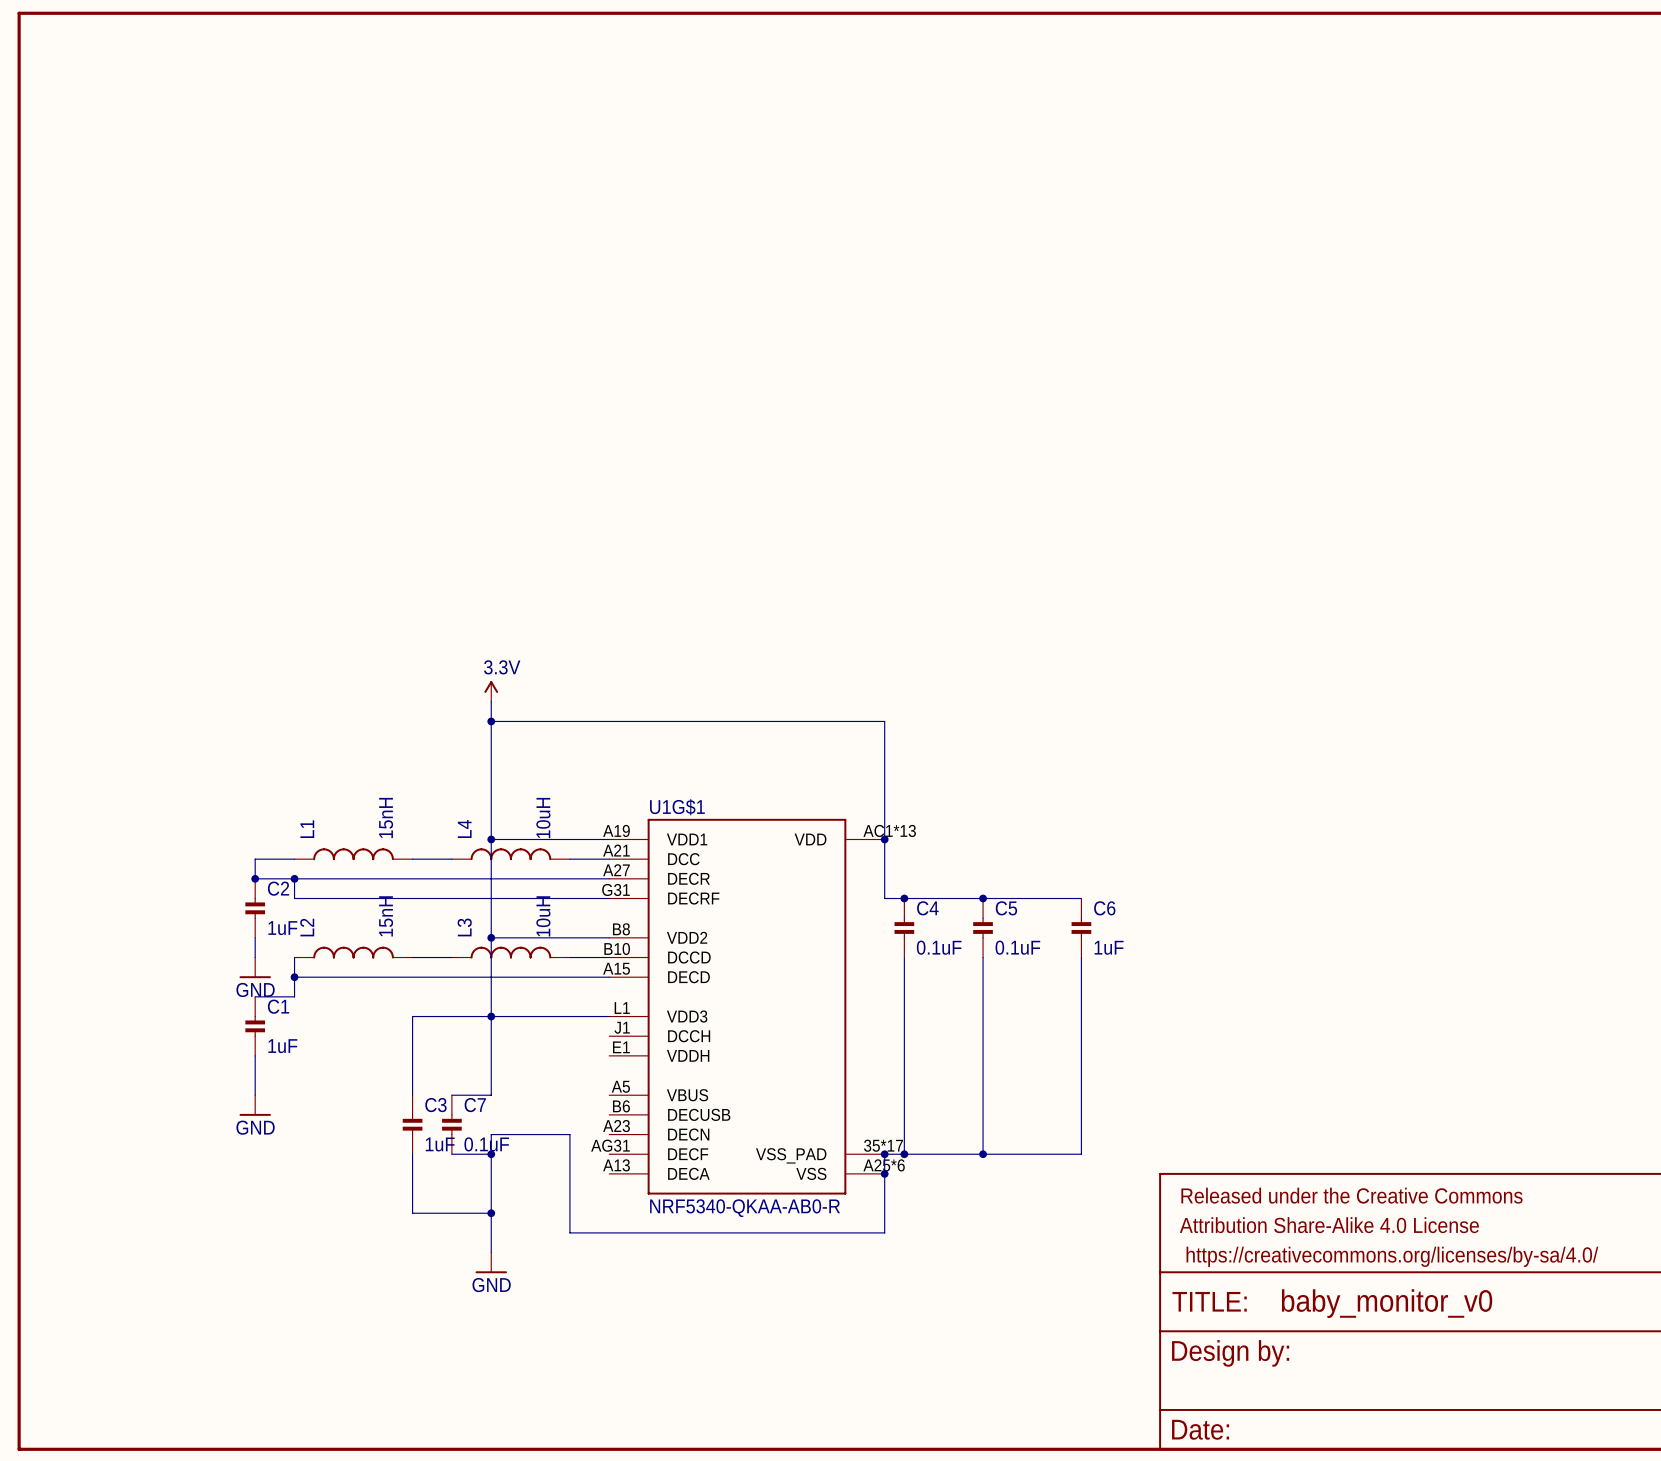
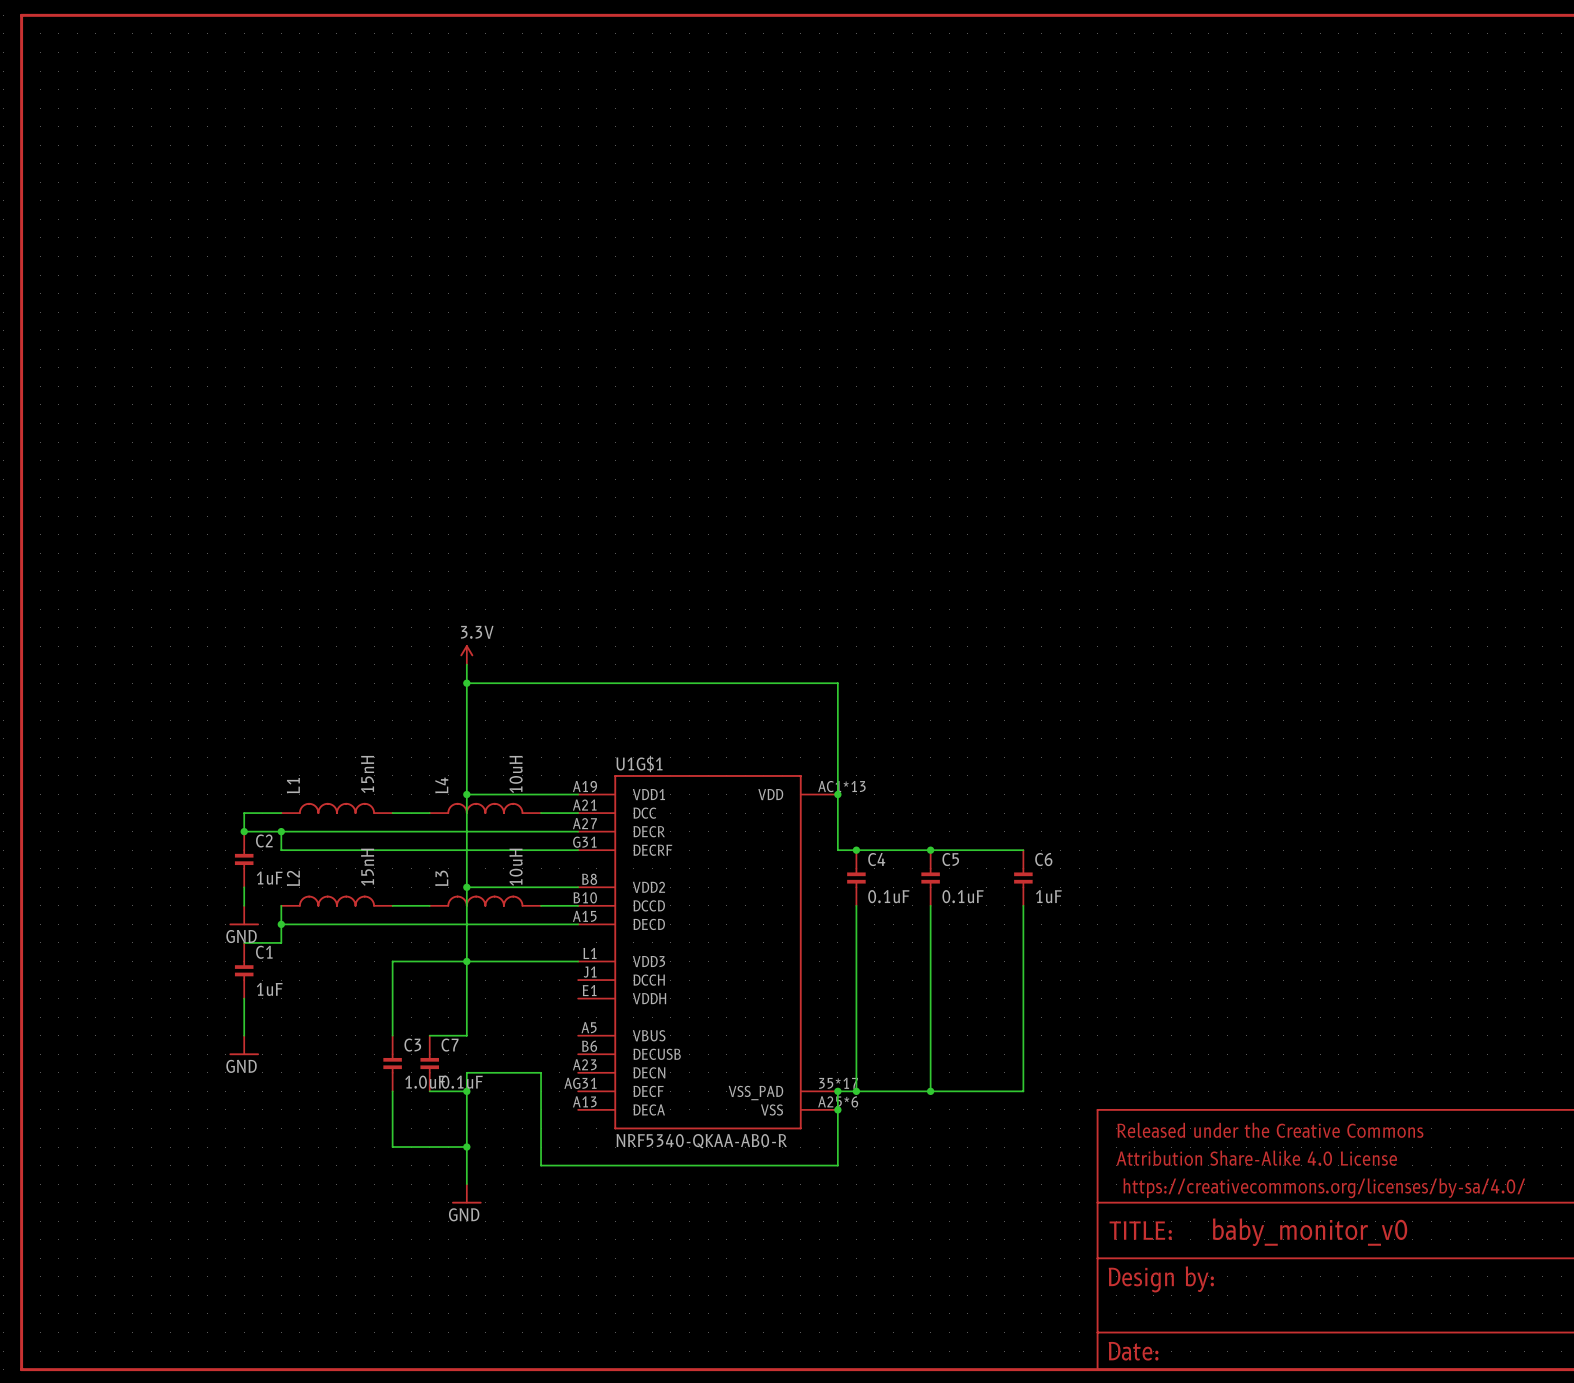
C3 value: 1uF (440, 1144) -> 1.0uF (425, 1082)

